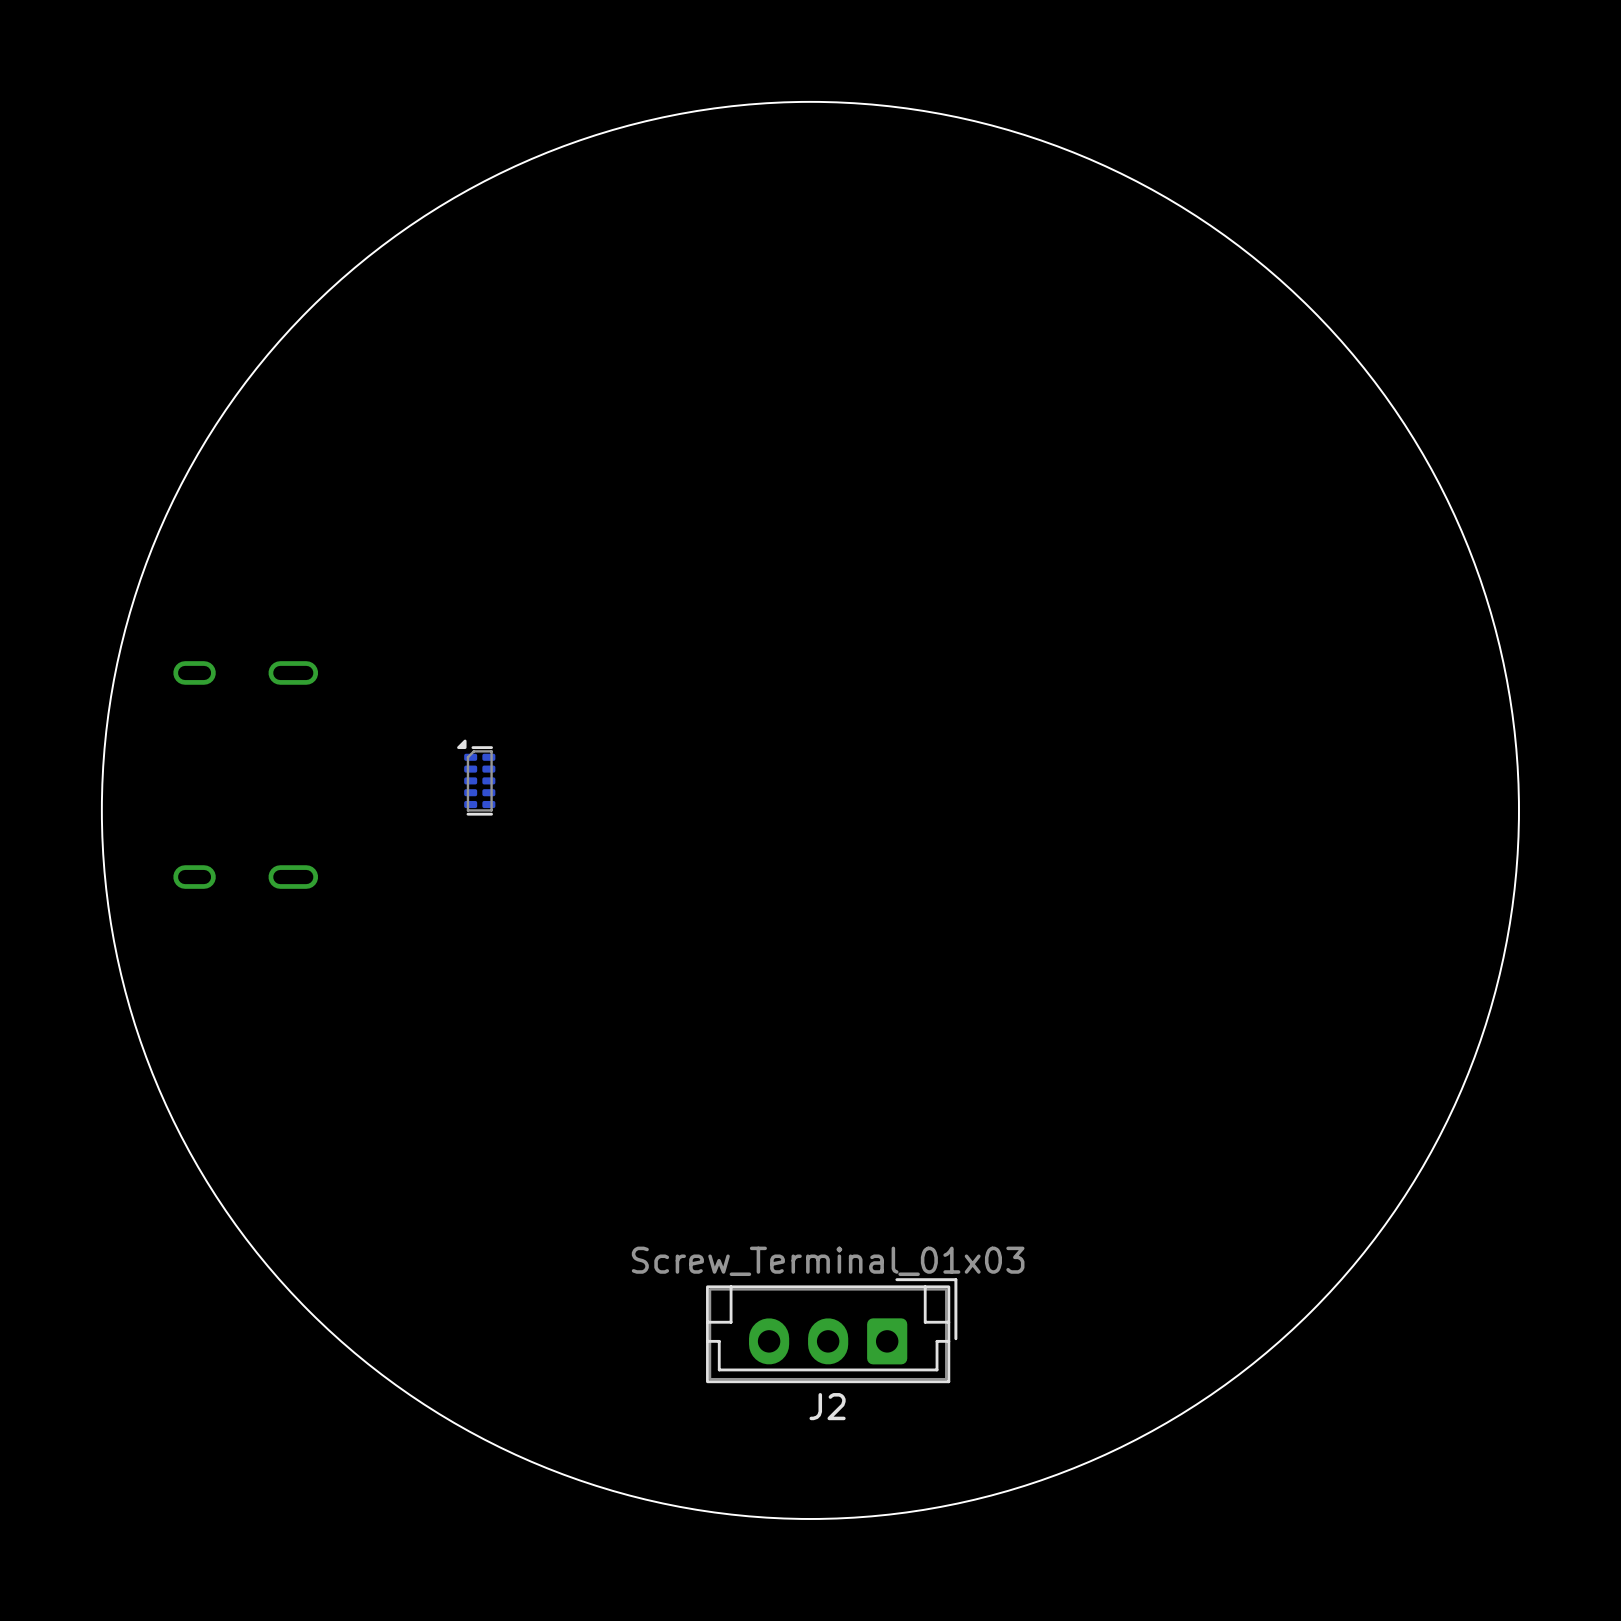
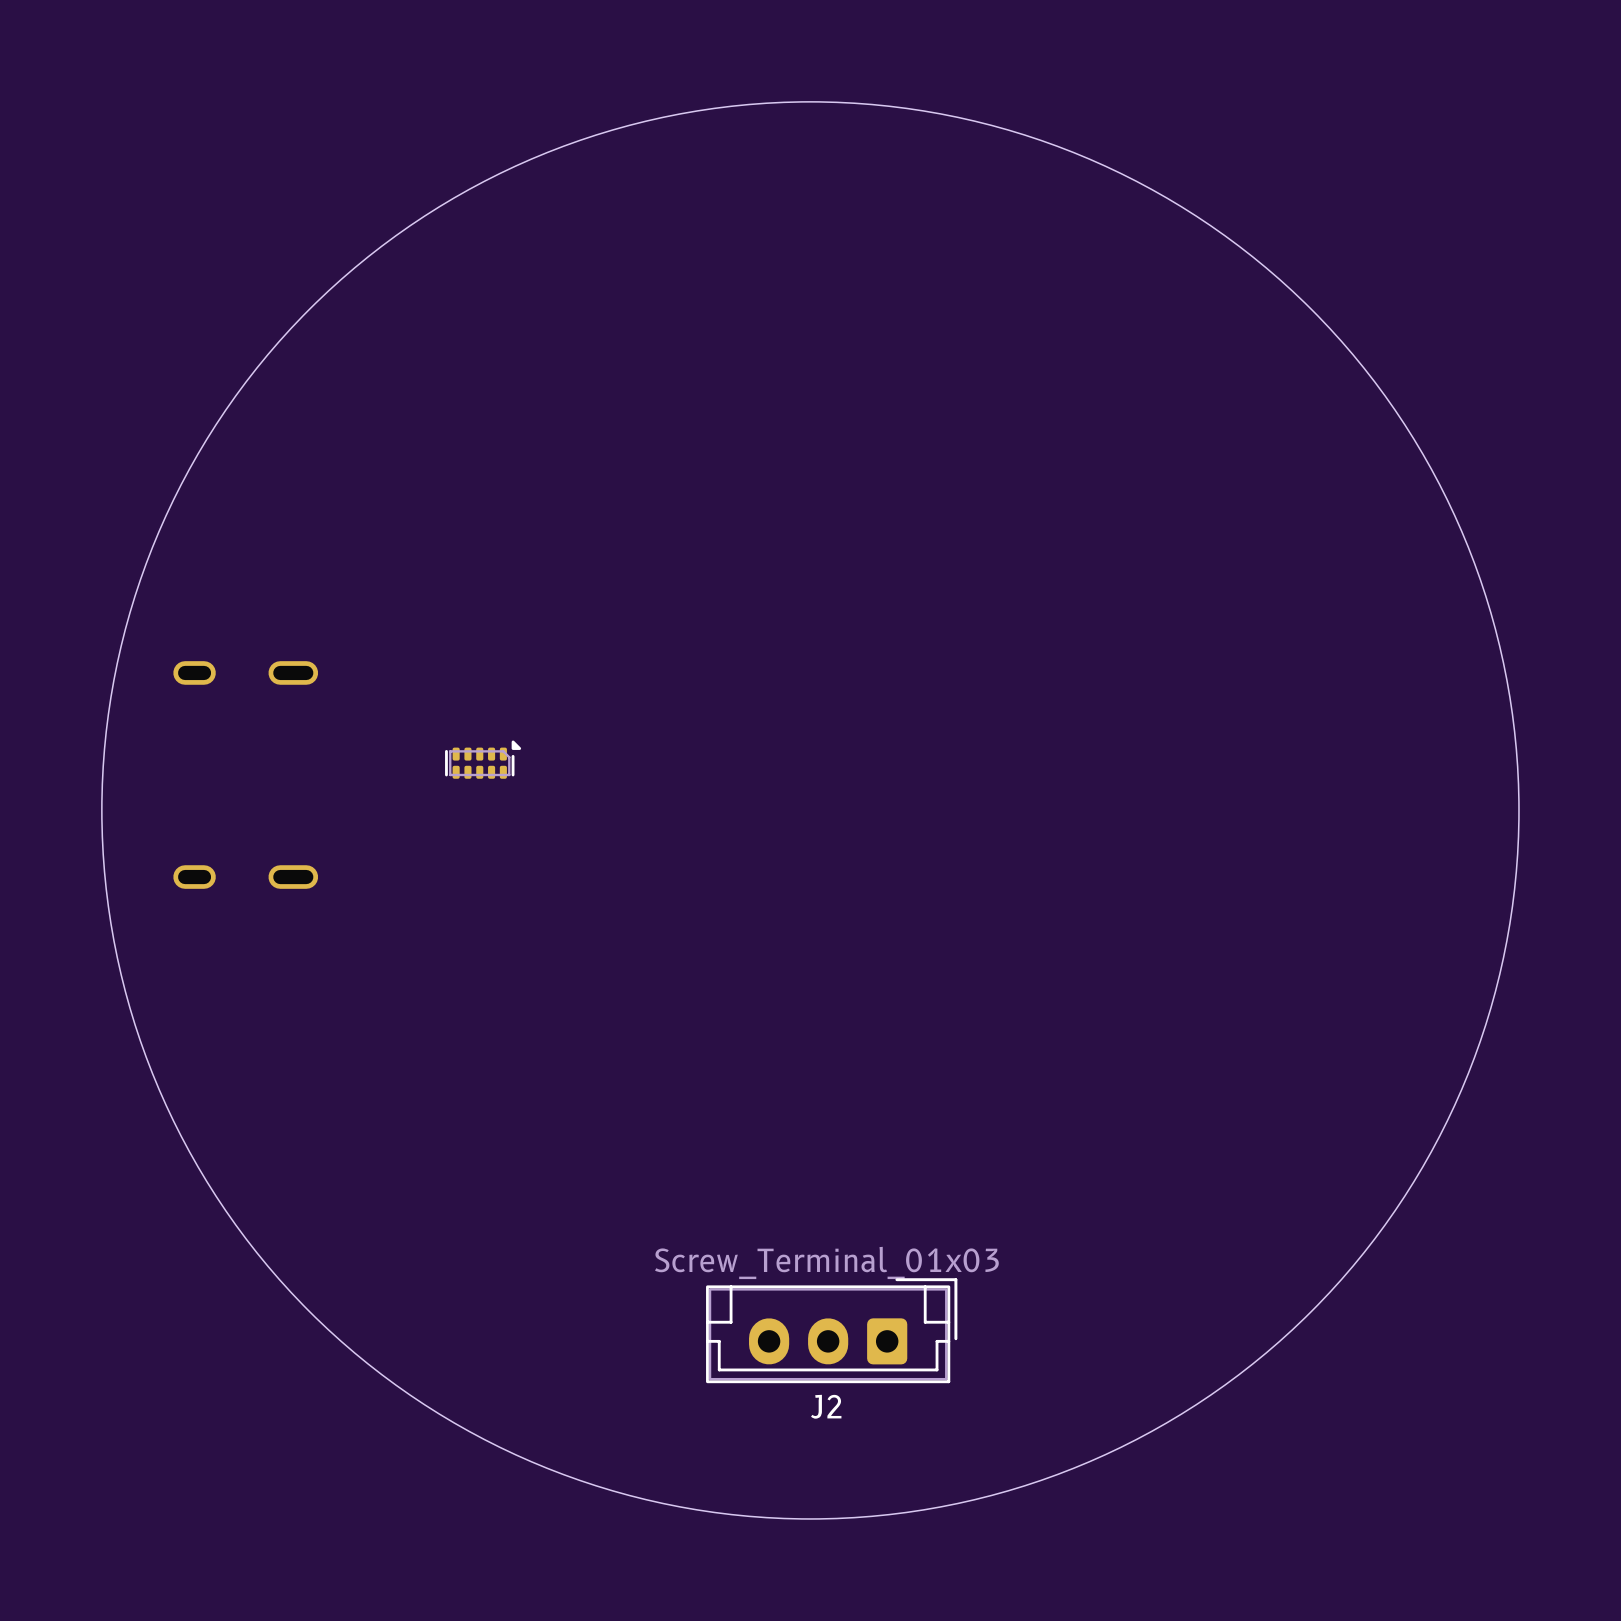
part rotation: 0° (476, 777) -> 90° clockwise (483, 759)

